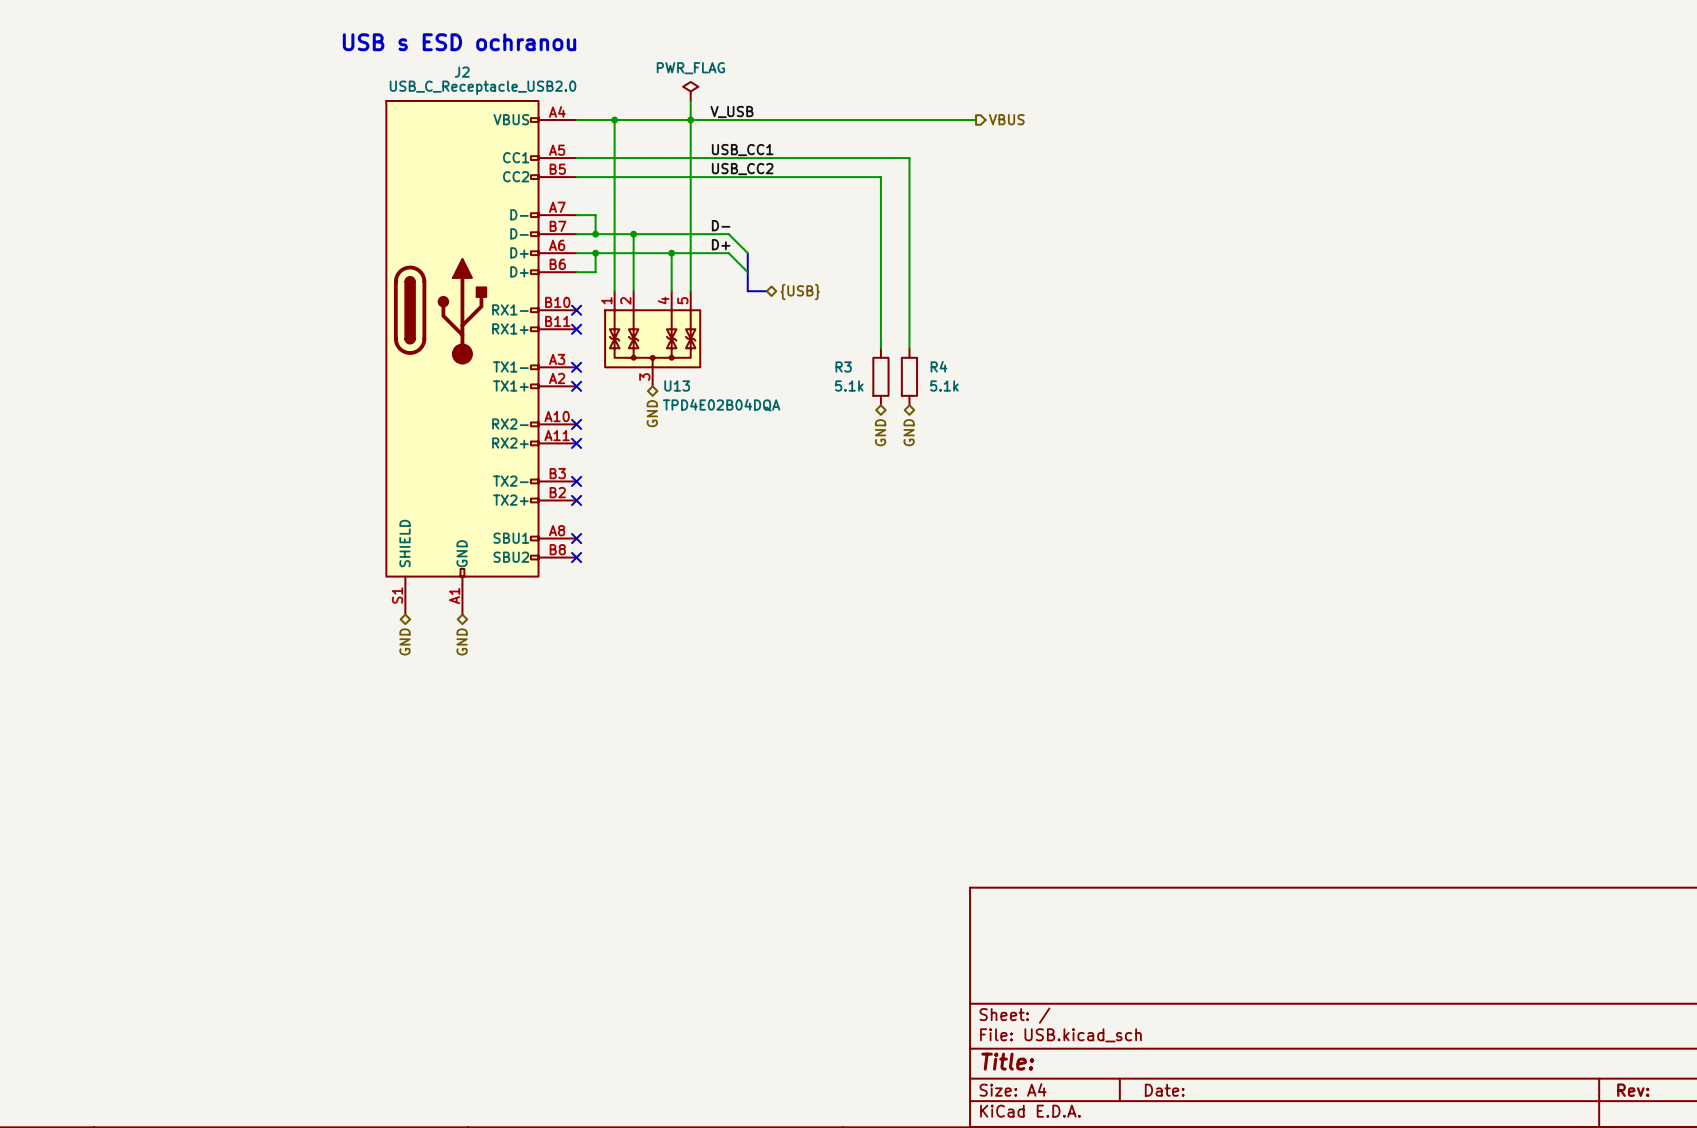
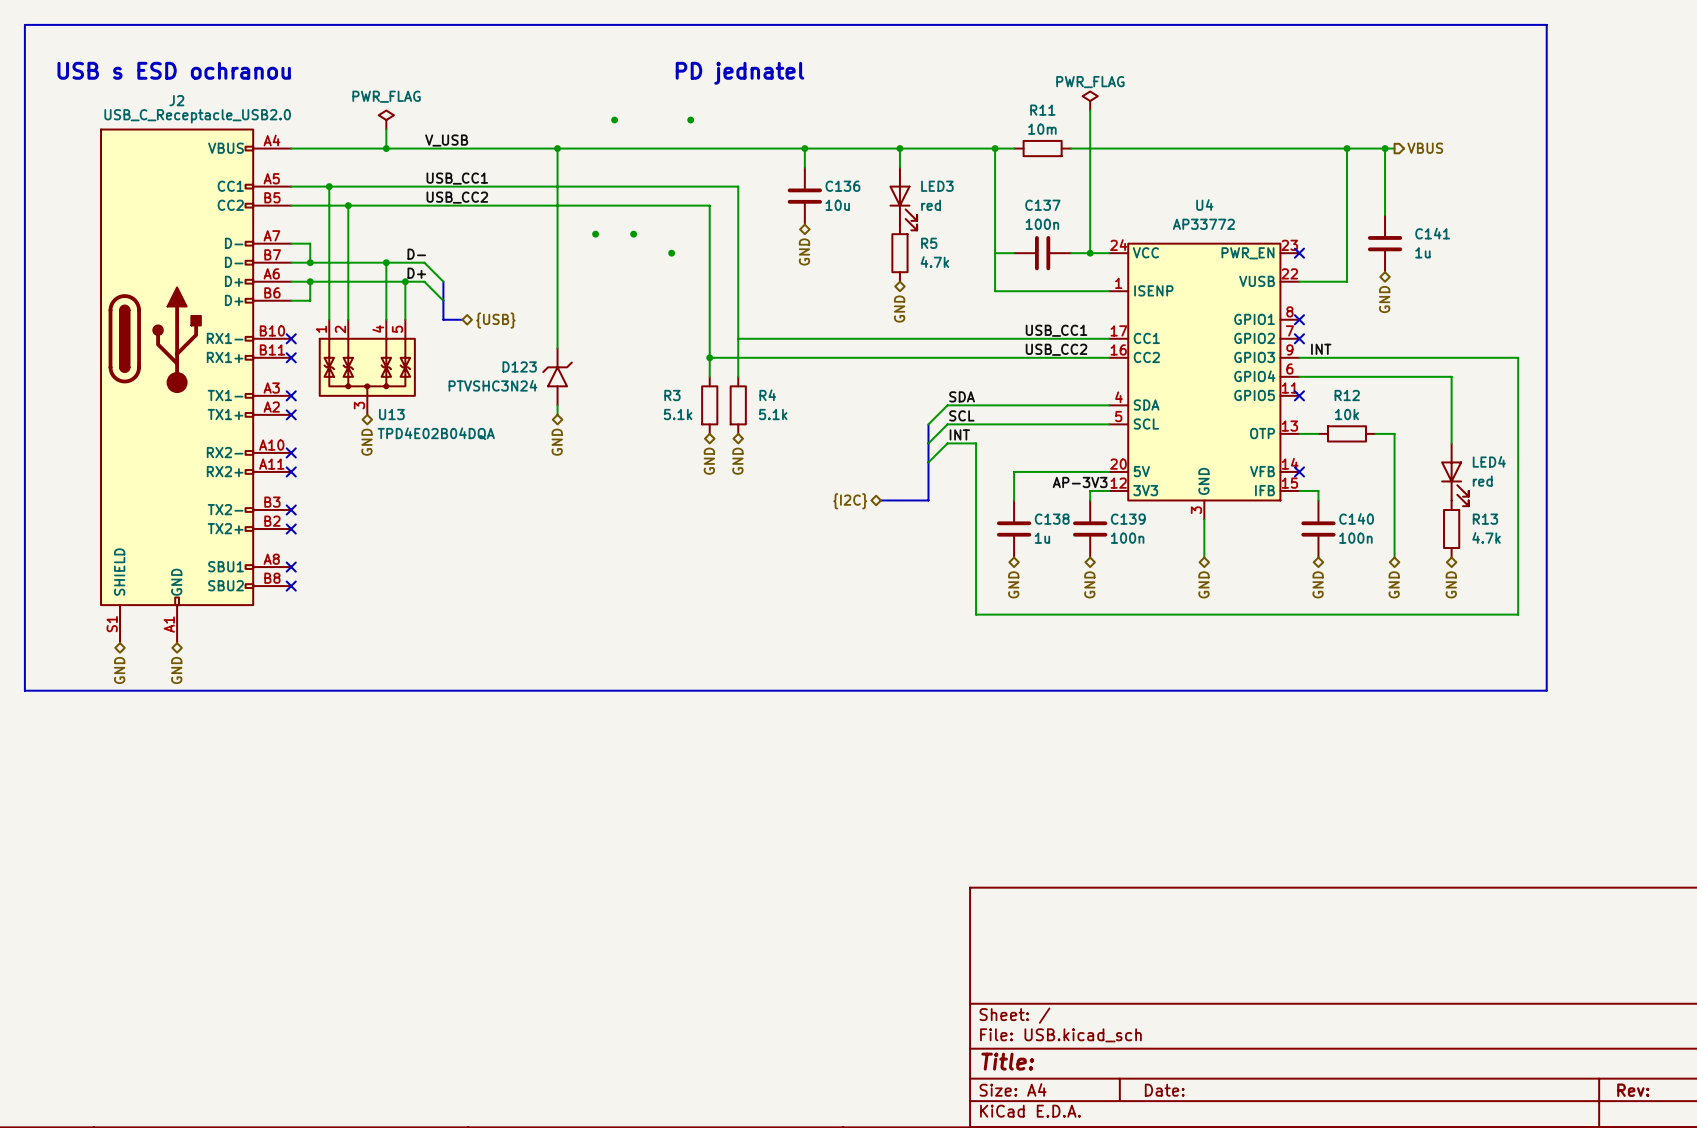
line: none -> (24, 24) (24, 690) (1546, 690) (1546, 24) (24, 24)
text: USB s ESD ochranou (459, 42) -> none
text: none -> USB s ESD ochranou (174, 70)
text: none -> PD jednatel (739, 73)
power symbol: PWR_FLAG (690, 91) -> none
wire: (690, 101) (690, 291) -> none
power symbol: none -> PWR_FLAG (1090, 101)
wire: none -> (1090, 110) (1090, 253)
label: V_USB (731, 111) -> none
hierarchical label: VBUS (1006, 119) -> none
power symbol: none -> PWR_FLAG (386, 120)
wire: (576, 120) (976, 120) -> none
wire: (614, 120) (614, 291) -> none
label: none -> V_USB (446, 140)
wire: none -> (291, 148) (1014, 148)
junction: none -> (386, 148)
wire: none -> (557, 148) (557, 348)
junction: none -> (557, 148)
wire: none -> (804, 148) (804, 167)
junction: none -> (804, 148)
wire: none -> (899, 148) (899, 167)
junction: none -> (899, 148)
wire: none -> (995, 148) (995, 291) (1109, 291)
junction: none -> (995, 148)
R11: none -> 10m (1042, 148)
wire: none -> (1071, 148) (1394, 148)
wire: none -> (1346, 148) (1346, 281) (1299, 281)
junction: none -> (1346, 148)
wire: none -> (1385, 148) (1385, 215)
junction: none -> (1385, 148)
hierarchical label: none -> VBUS (1425, 148)
label: USB_CC1 (742, 150) -> none
wire: (576, 158) (909, 158) (909, 348) -> none
label: USB_CC2 (742, 169) -> none
wire: (576, 177) (880, 177) (880, 348) -> none
label: none -> USB_CC1 (457, 178)
wire: none -> (291, 186) (738, 186) (738, 376)
wire: none -> (329, 186) (329, 319)
junction: none -> (329, 186)
C136: none -> 10u (804, 196)
label: none -> USB_CC2 (457, 197)
LED3: none -> red (903, 198)
wire: none -> (291, 205) (709, 205) (709, 376)
wire: none -> (348, 205) (348, 319)
junction: none -> (348, 205)
wire: (576, 215) (595, 215) (595, 234) -> none
label: D- (721, 225) -> none
wire: (576, 234) (728, 234) (747, 253) -> none
wire: (633, 234) (633, 291) -> none
wire: none -> (291, 243) (310, 243) (310, 262)
C141: none -> 1u (1385, 243)
label: D+ (721, 244) -> none
hierarchical label: none -> GND (804, 251)
wire: (576, 253) (728, 253) (747, 272) -> none
wire: (595, 253) (595, 272) (576, 272) -> none
junction: (595, 253) -> none
wire: (671, 253) (671, 291) -> none
bus: (747, 253) (747, 291) (766, 291) -> none
R5: none -> 4.7k (899, 253)
wire: none -> (995, 253) (1014, 253)
C137: none -> 100n (1042, 253)
wire: none -> (1071, 253) (1109, 253)
junction: none -> (1090, 253)
no-connect mark: none -> (1299, 253)
label: none -> D- (416, 254)
wire: none -> (291, 262) (424, 262) (443, 281)
junction: none -> (310, 262)
junction: none -> (386, 262)
label: none -> D+ (416, 273)
wire: none -> (291, 281) (424, 281) (443, 300)
wire: none -> (310, 281) (310, 300) (291, 300)
junction: none -> (310, 281)
junction: none -> (405, 281)
bus: none -> (443, 281) (443, 319) (462, 319)
hierarchical label: {USB} (800, 292) -> none
hierarchical label: none -> GND (1384, 299)
hierarchical label: none -> GND (899, 309)
no-connect mark: (576, 310) -> none
no-connect mark: none -> (1299, 319)
hierarchical label: none -> {USB} (495, 320)
no-connect mark: (576, 329) -> none
label: none -> USB_CC1 (1056, 330)
no-connect mark: none -> (291, 338)
U13 position: (652, 338) -> (367, 367)
wire: none -> (738, 338) (1109, 338)
no-connect mark: none -> (1299, 338)
label: none -> USB_CC2 (1056, 349)
label: none -> INT (1321, 349)
no-connect mark: none -> (291, 357)
J2 position: (480, 357) -> (195, 385)
wire: none -> (709, 357) (1109, 357)
junction: none -> (709, 357)
wire: none -> (1299, 357) (1518, 357) (1518, 614) (976, 614) (976, 443) (947, 443) (928, 462)
no-connect mark: (576, 367) -> none
D123: none -> PTVSHC3N24 (557, 376)
R3 position: (880, 376) -> (709, 405)
R4 position: (909, 376) -> (738, 405)
wire: none -> (1299, 376) (1451, 376) (1451, 443)
U4: none -> AP33772 (1204, 381)
no-connect mark: (576, 386) -> none
no-connect mark: none -> (291, 395)
no-connect mark: none -> (1299, 395)
label: none -> SDA (962, 396)
wire: none -> (557, 405) (557, 414)
wire: none -> (1109, 405) (947, 405) (928, 424)
hierarchical label: GND (652, 413) -> none
no-connect mark: none -> (291, 414)
label: none -> SCL (961, 415)
no-connect mark: (576, 424) -> none
bus: none -> (928, 424) (928, 500) (880, 500)
wire: none -> (1109, 424) (947, 424) (928, 443)
hierarchical label: GND (880, 432) -> none
hierarchical label: GND (909, 432) -> none
wire: none -> (1299, 433) (1318, 433)
R12: none -> 10k (1346, 433)
wire: none -> (1375, 433) (1394, 433) (1394, 557)
label: none -> INT (959, 434)
hierarchical label: none -> GND (366, 442)
hierarchical label: none -> GND (557, 442)
no-connect mark: (576, 443) -> none
no-connect mark: none -> (291, 452)
hierarchical label: none -> GND (709, 461)
hierarchical label: none -> GND (737, 461)
no-connect mark: none -> (291, 471)
wire: none -> (1109, 471) (1014, 471) (1014, 500)
no-connect mark: none -> (1299, 471)
LED4: none -> red (1454, 474)
no-connect mark: (576, 481) -> none
label: none -> AP-3V3 (1080, 482)
wire: none -> (1109, 490) (1090, 490) (1090, 500)
wire: none -> (1299, 490) (1318, 490) (1318, 500)
no-connect mark: (576, 500) -> none
hierarchical label: none -> {I2C} (850, 501)
no-connect mark: none -> (291, 509)
wire: none -> (1204, 519) (1204, 557)
no-connect mark: none -> (291, 529)
C138: none -> 1u (1014, 529)
C139: none -> 100n (1090, 529)
C140: none -> 100n (1318, 529)
R13: none -> 4.7k (1451, 529)
no-connect mark: (576, 538) -> none
no-connect mark: (576, 557) -> none
no-connect mark: none -> (291, 567)
hierarchical label: none -> GND (1013, 584)
hierarchical label: none -> GND (1089, 584)
hierarchical label: none -> GND (1203, 584)
hierarchical label: none -> GND (1318, 584)
hierarchical label: none -> GND (1394, 584)
hierarchical label: none -> GND (1451, 584)
no-connect mark: none -> (291, 586)
hierarchical label: GND (405, 641) -> none
hierarchical label: GND (462, 641) -> none
hierarchical label: none -> GND (119, 670)
hierarchical label: none -> GND (176, 670)

